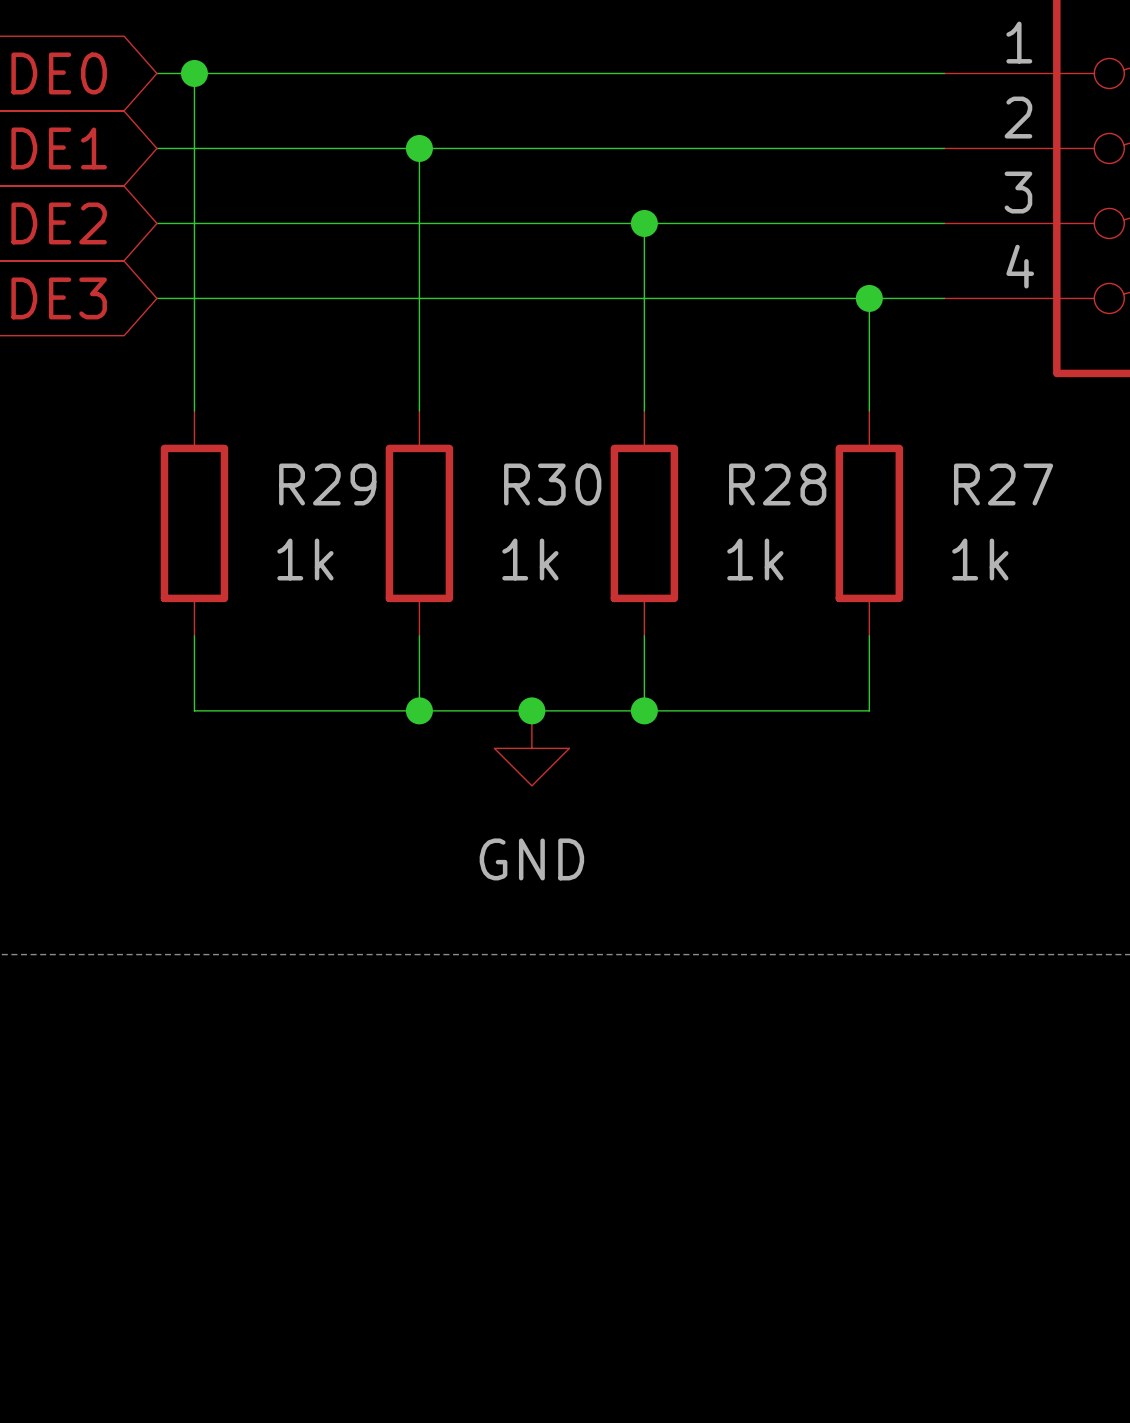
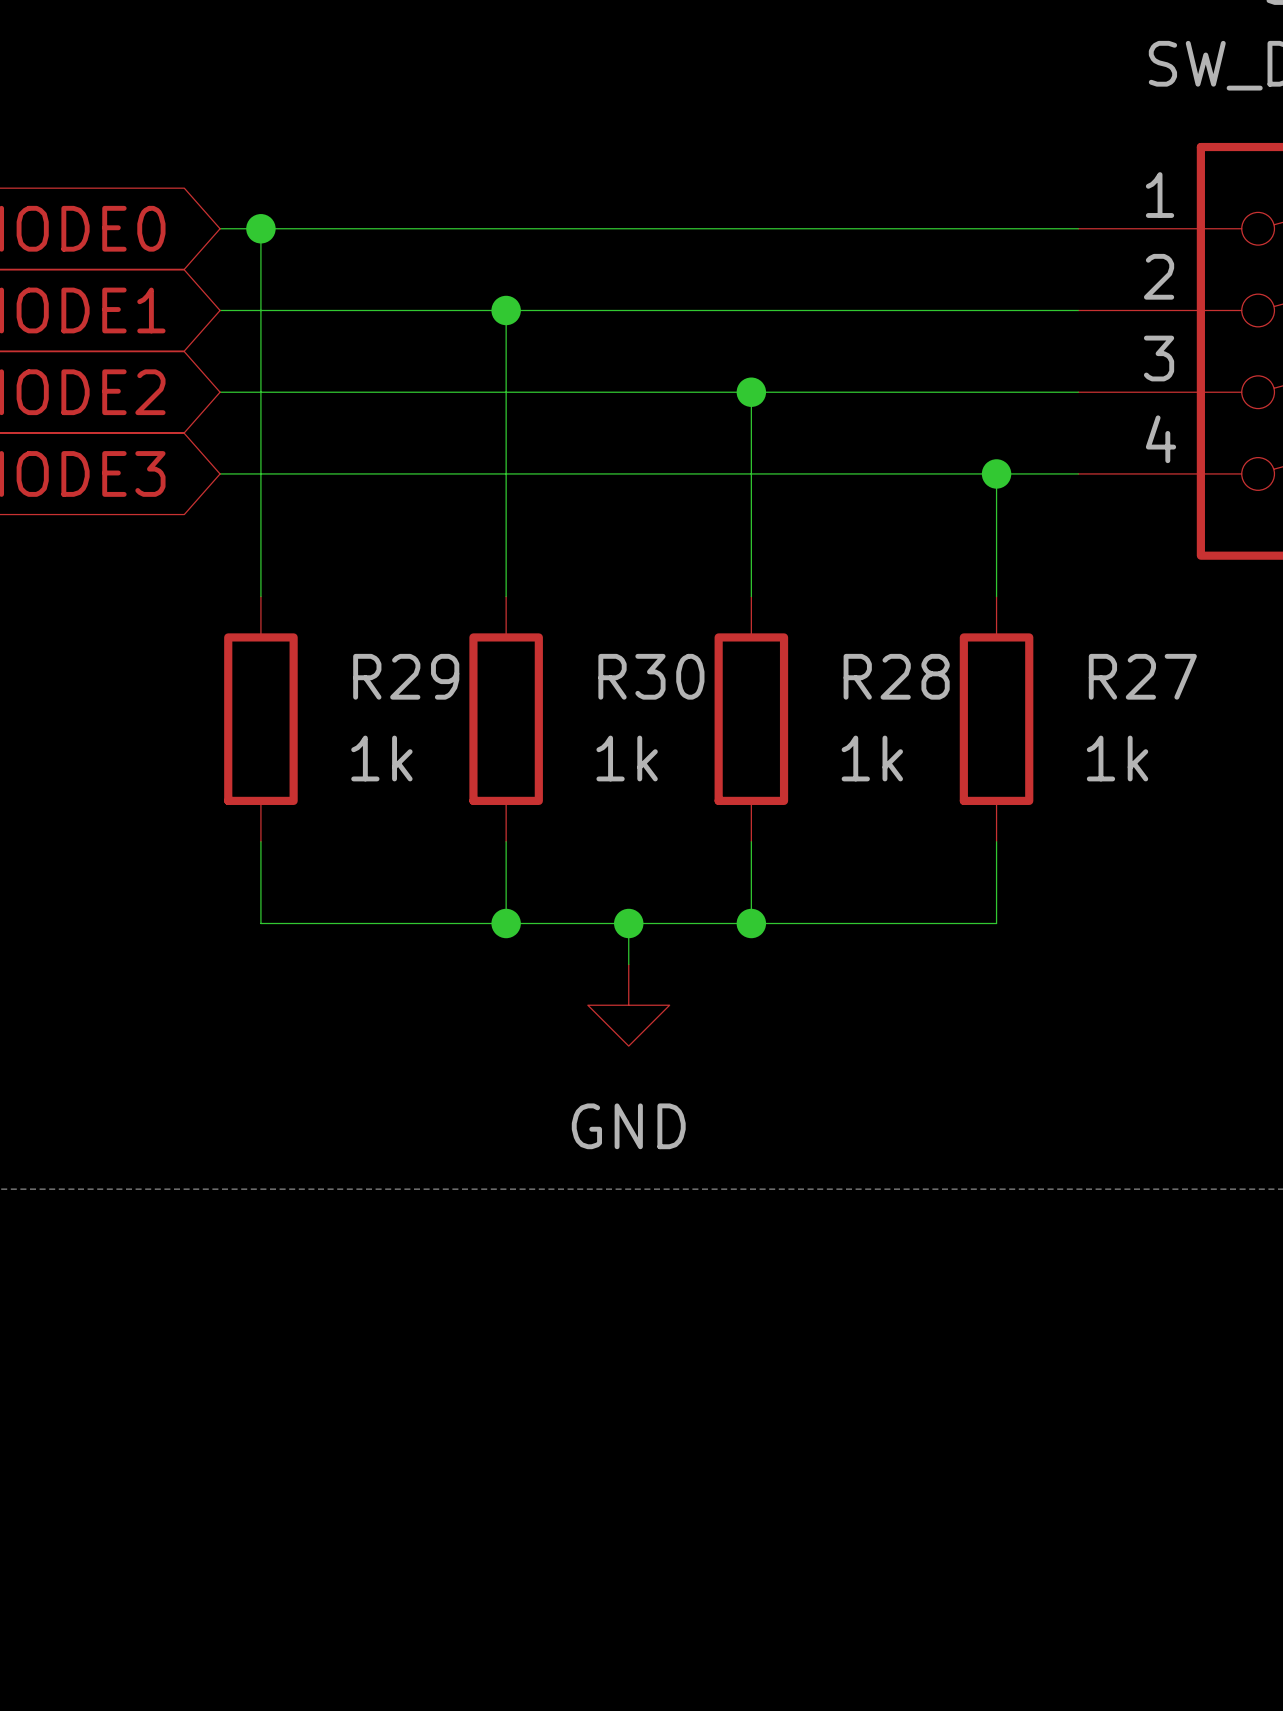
power symbol position: GND (531, 748) -> GND (628, 1005)

